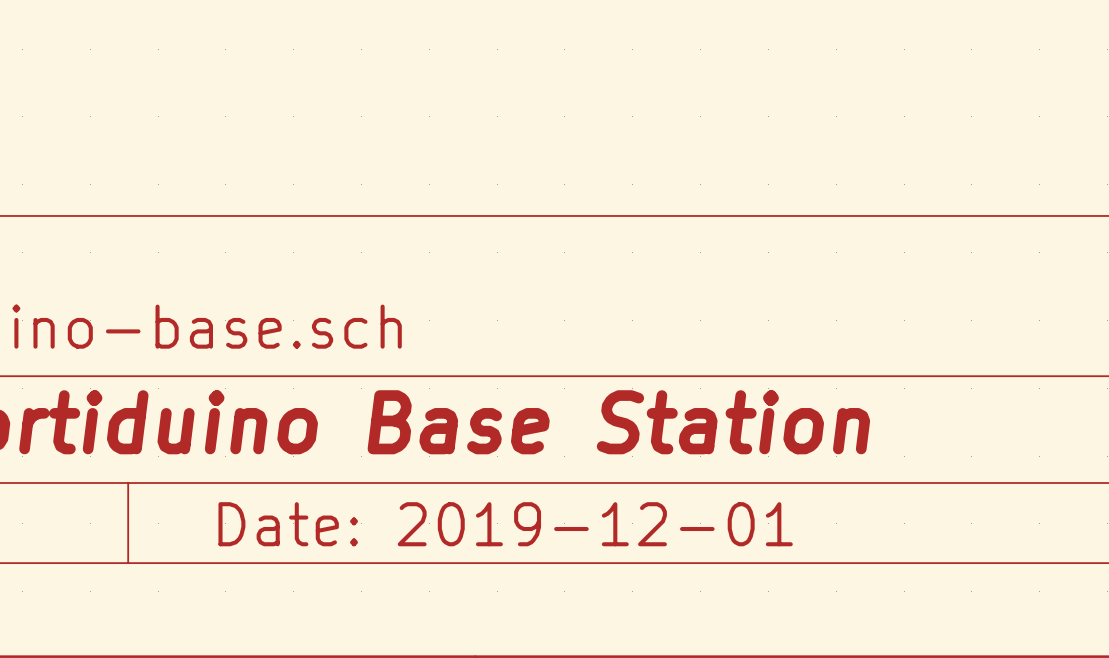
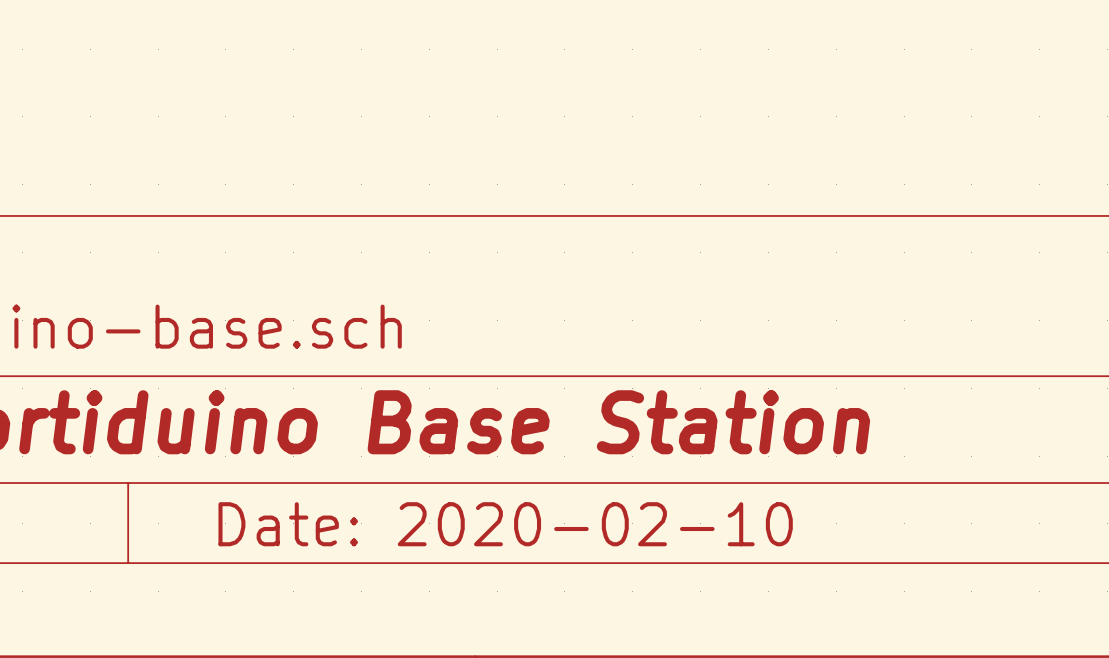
title block: Date: 2019-12-01 (505, 524) -> Date: 2020-02-10 (505, 524)

